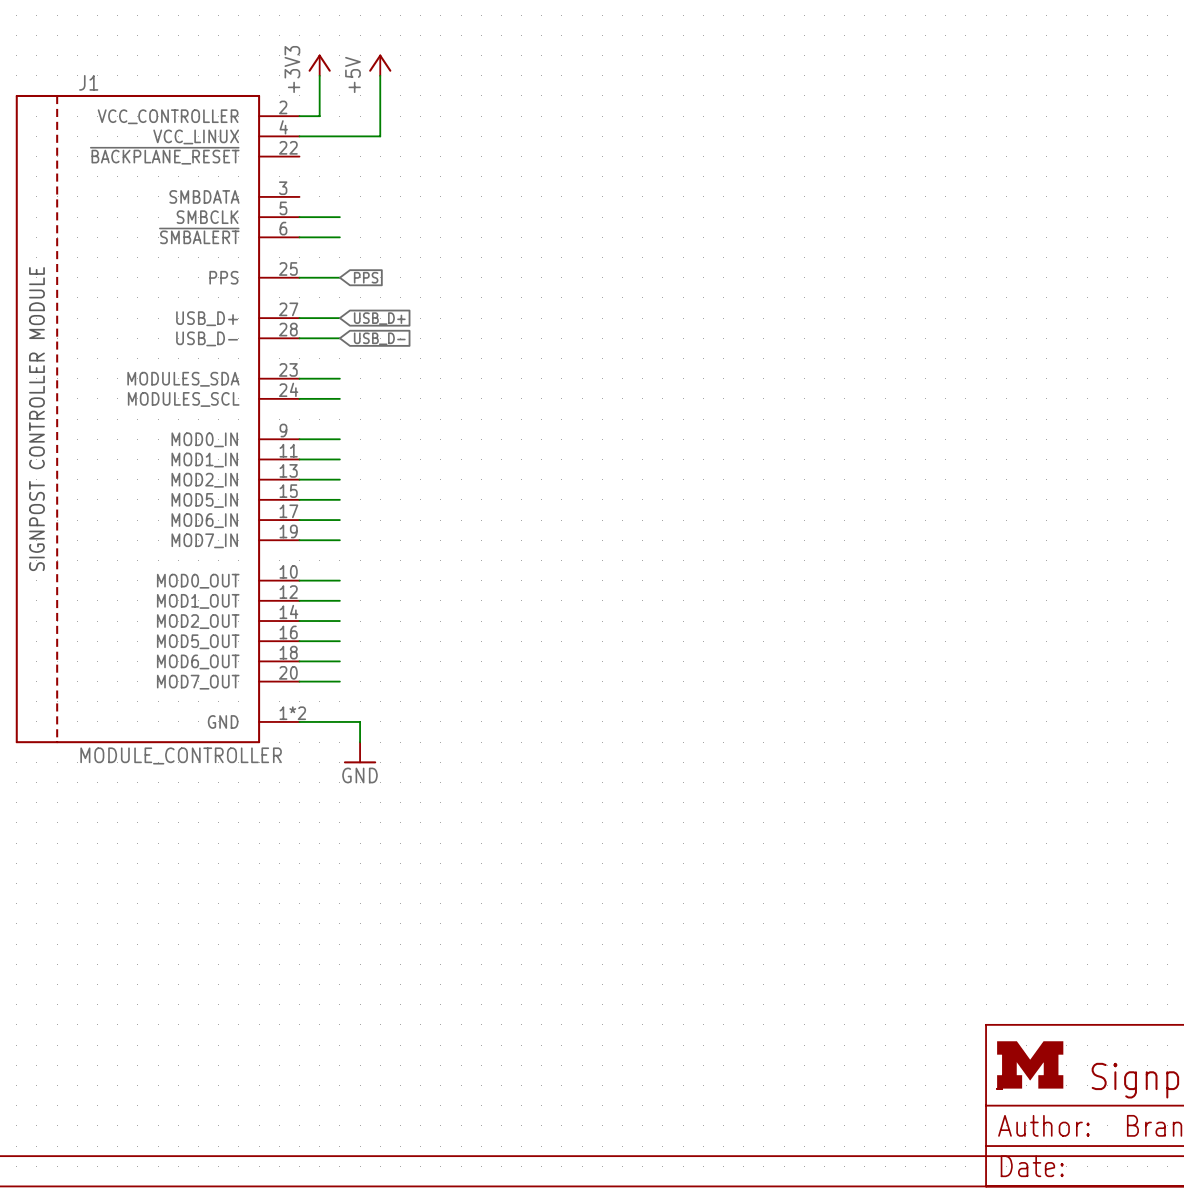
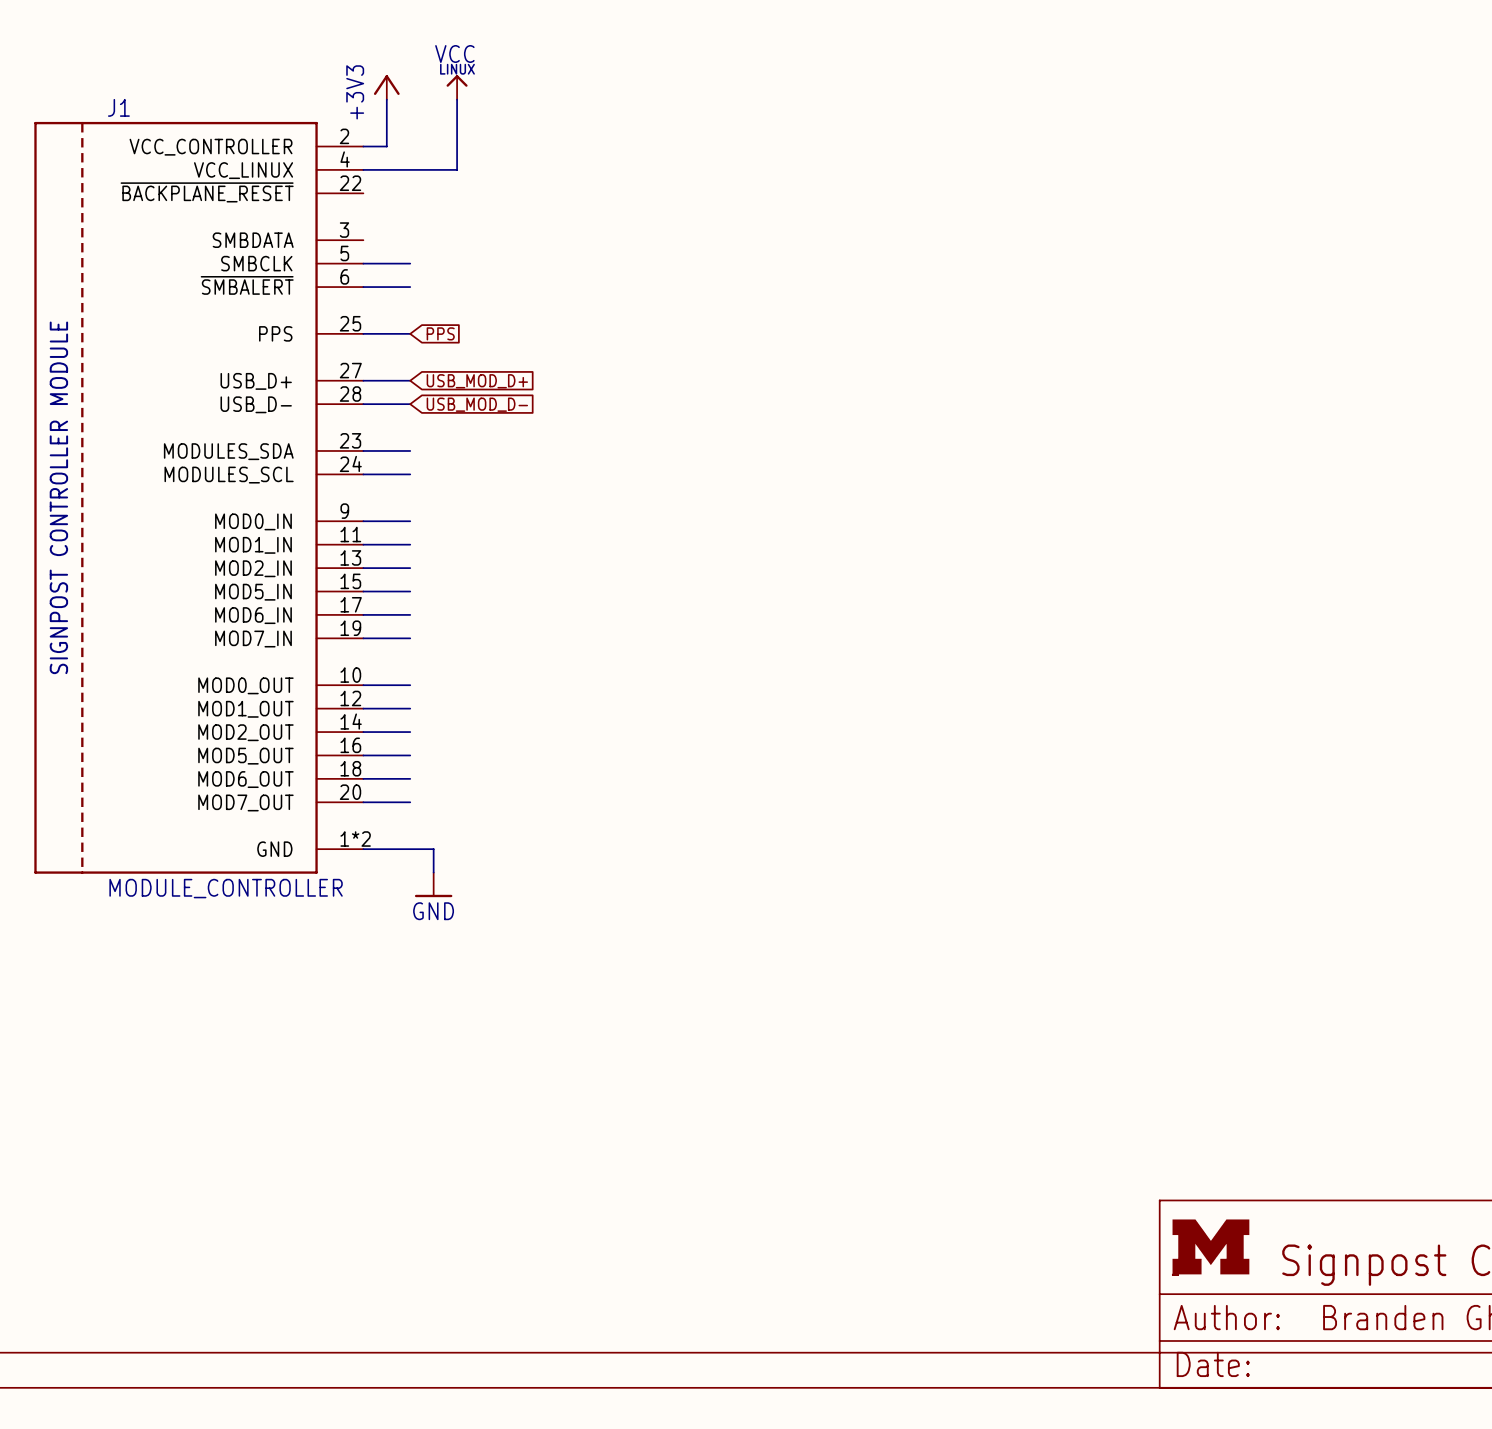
power symbol shape: [369, 54, 392, 76] -> [446, 75, 468, 100]
power symbol text: +5V (352, 74) -> none
global label: USB_D+ (379, 318) -> USB_MOD_D+ (477, 381)
global label: USB_D- (379, 338) -> USB_MOD_D- (477, 404)

